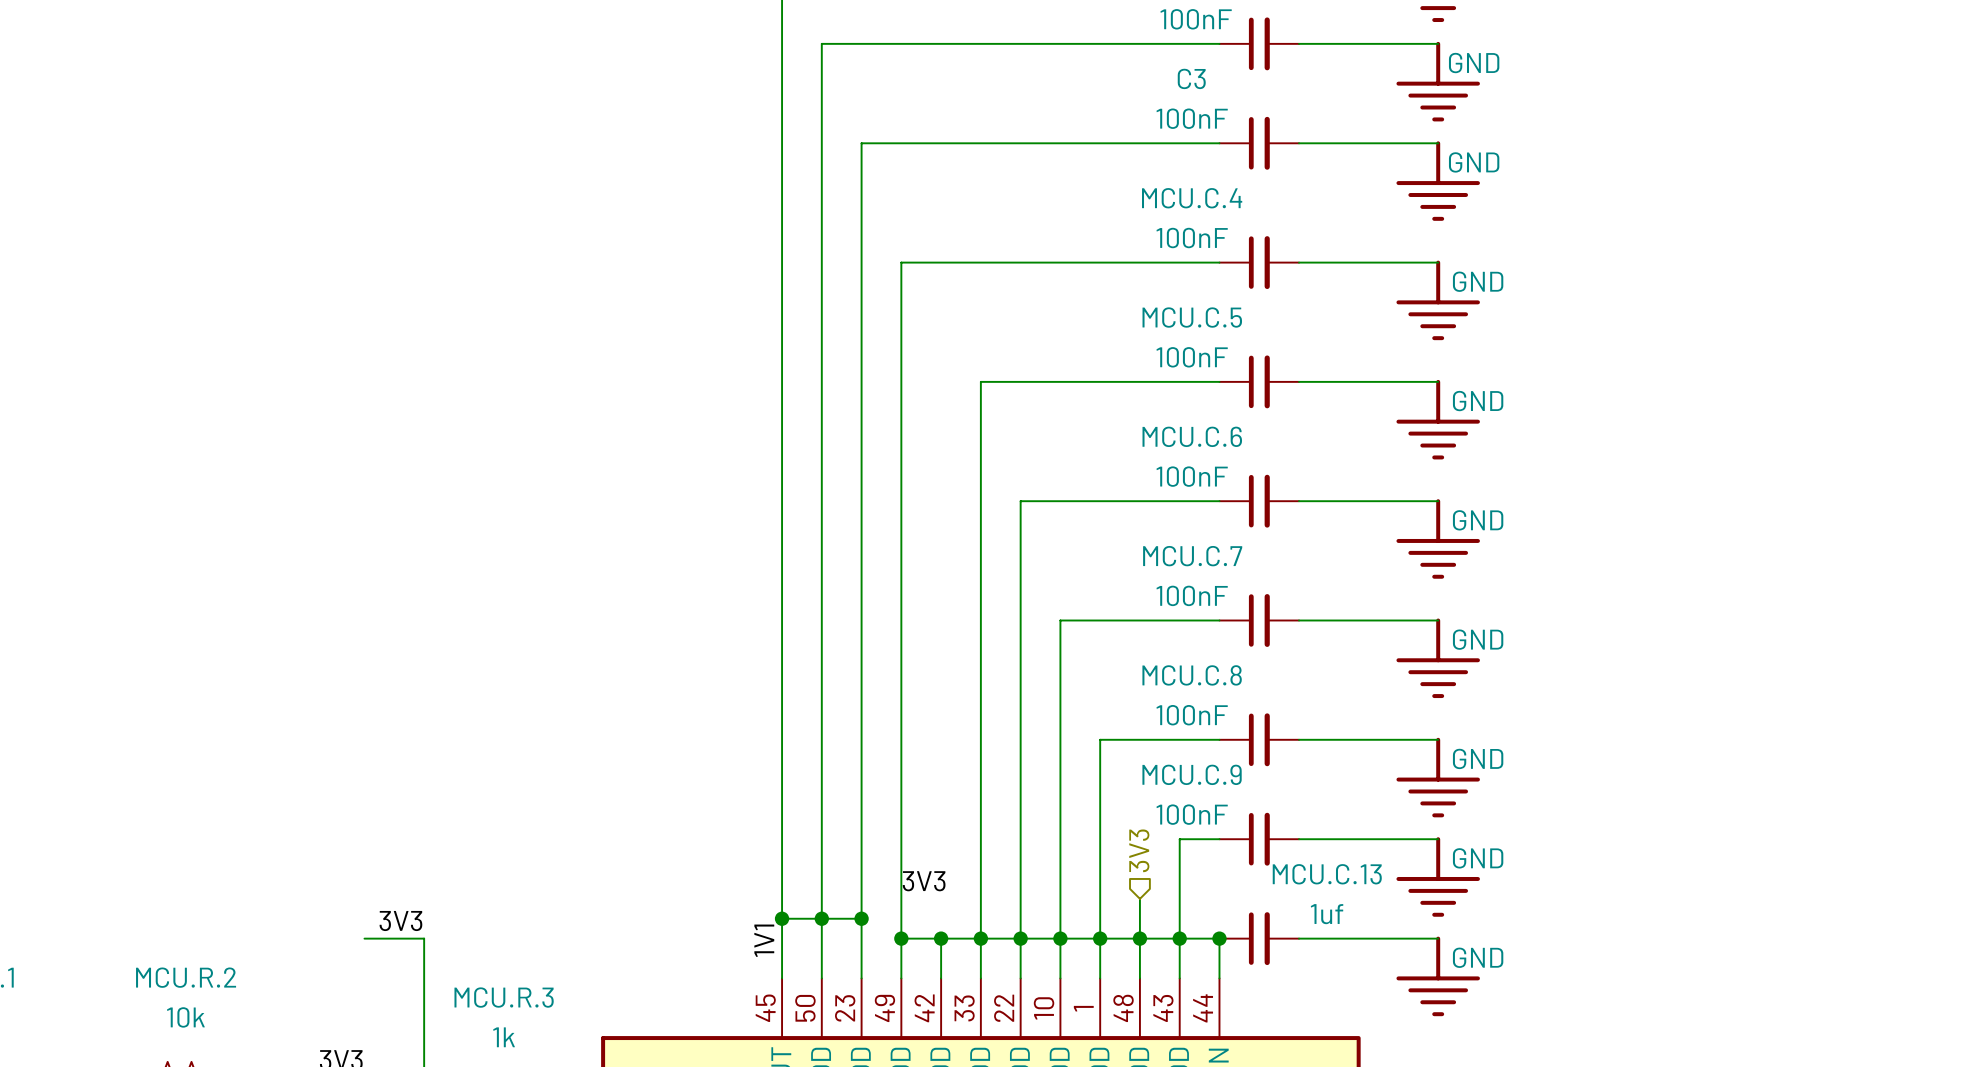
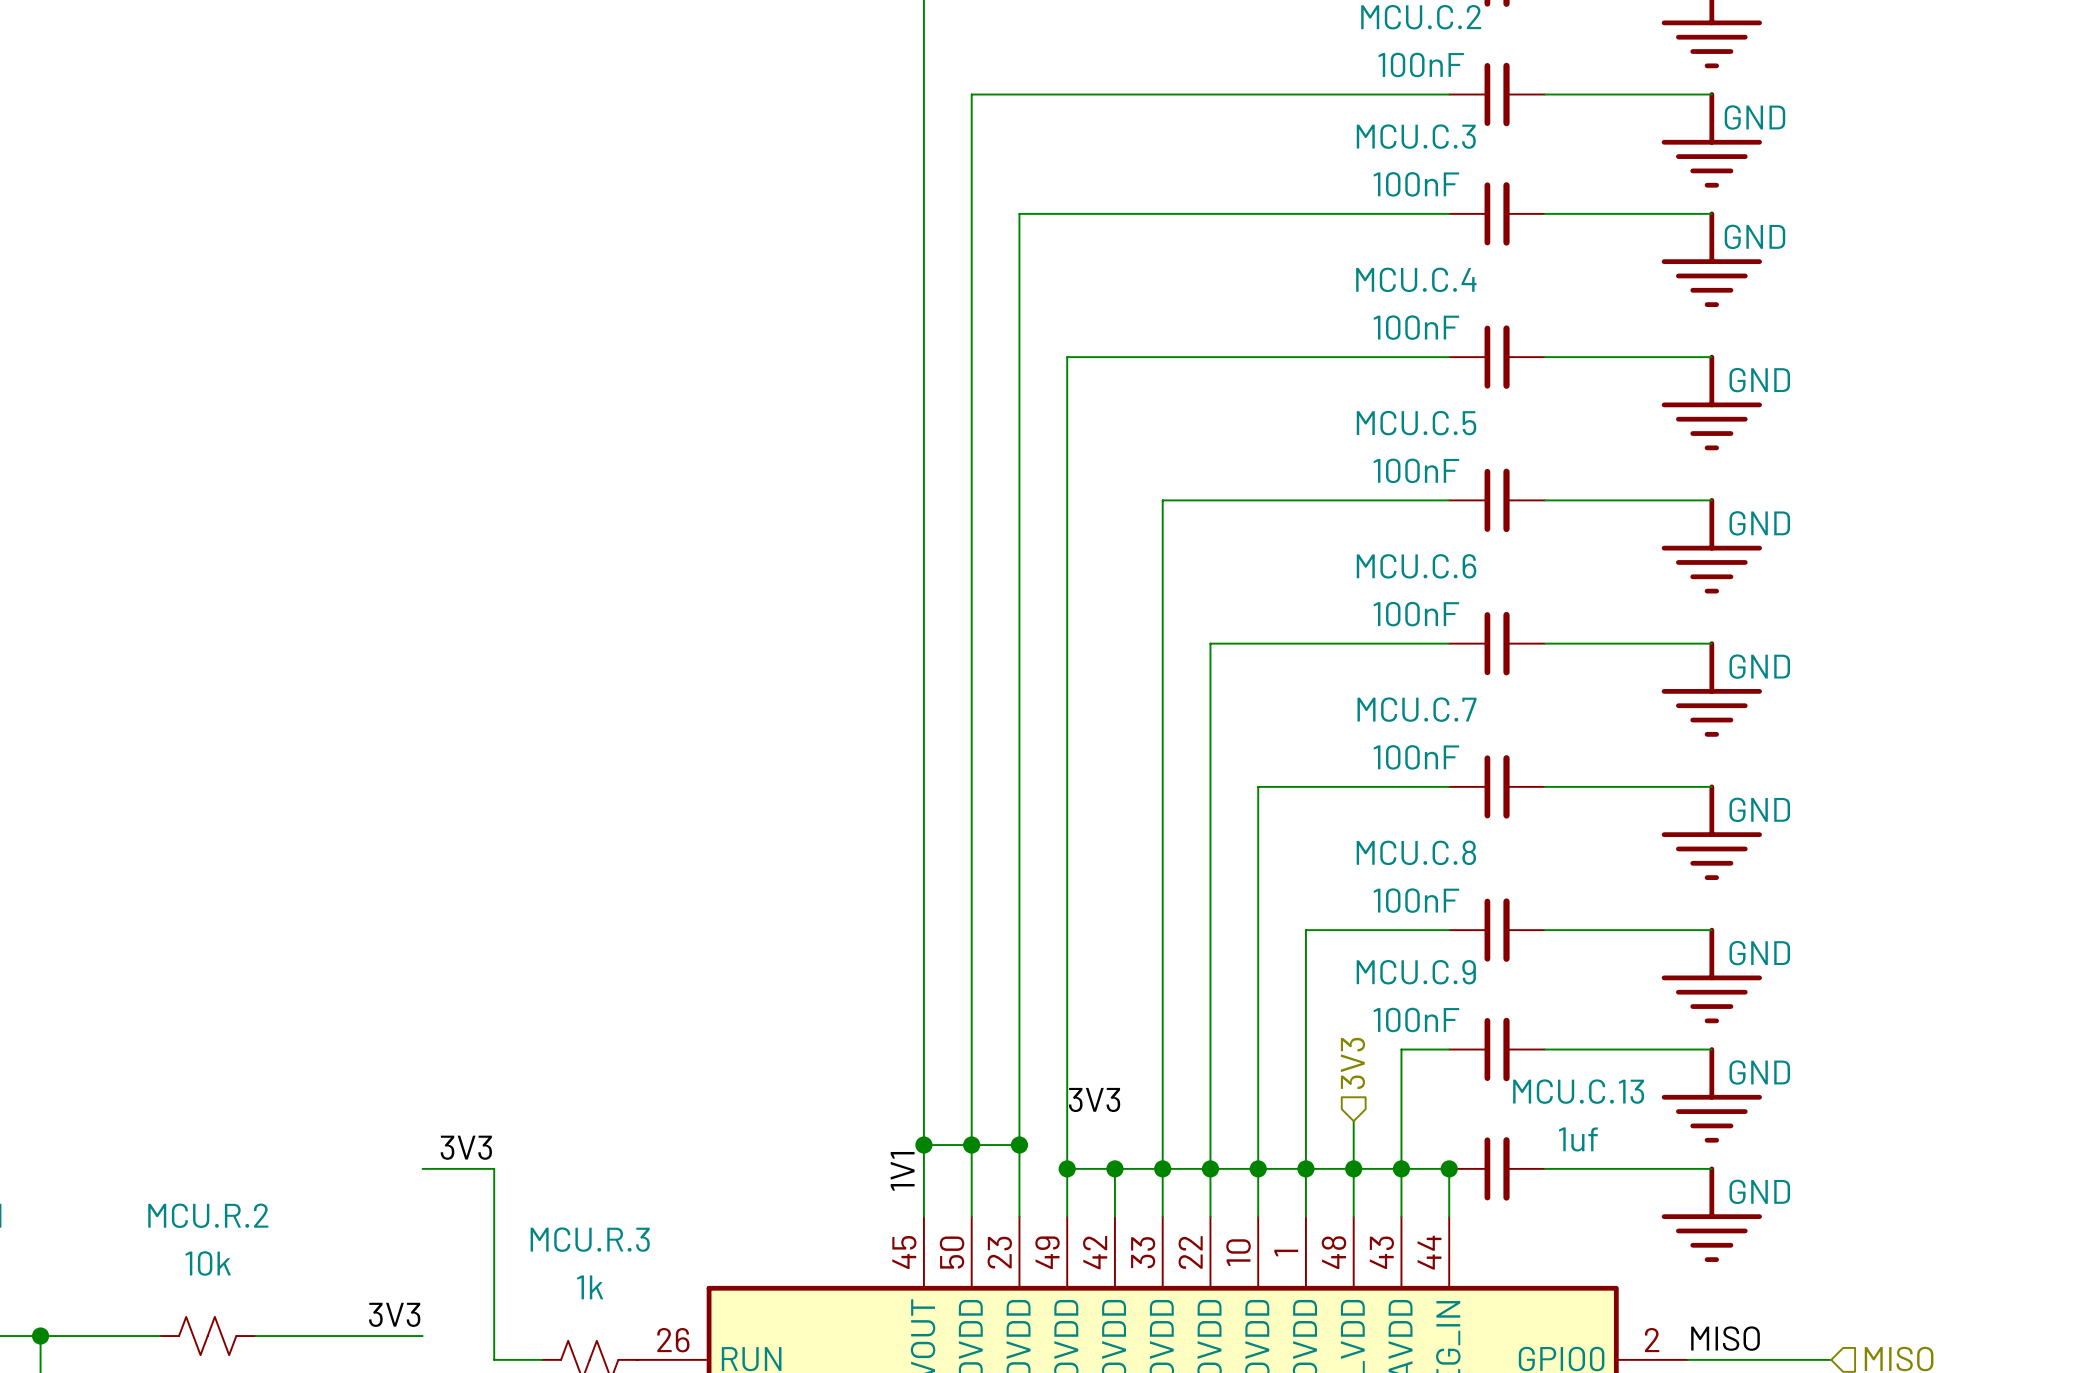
C3 name: C3 (1191, 78) -> MCU.C.3 (1416, 136)

